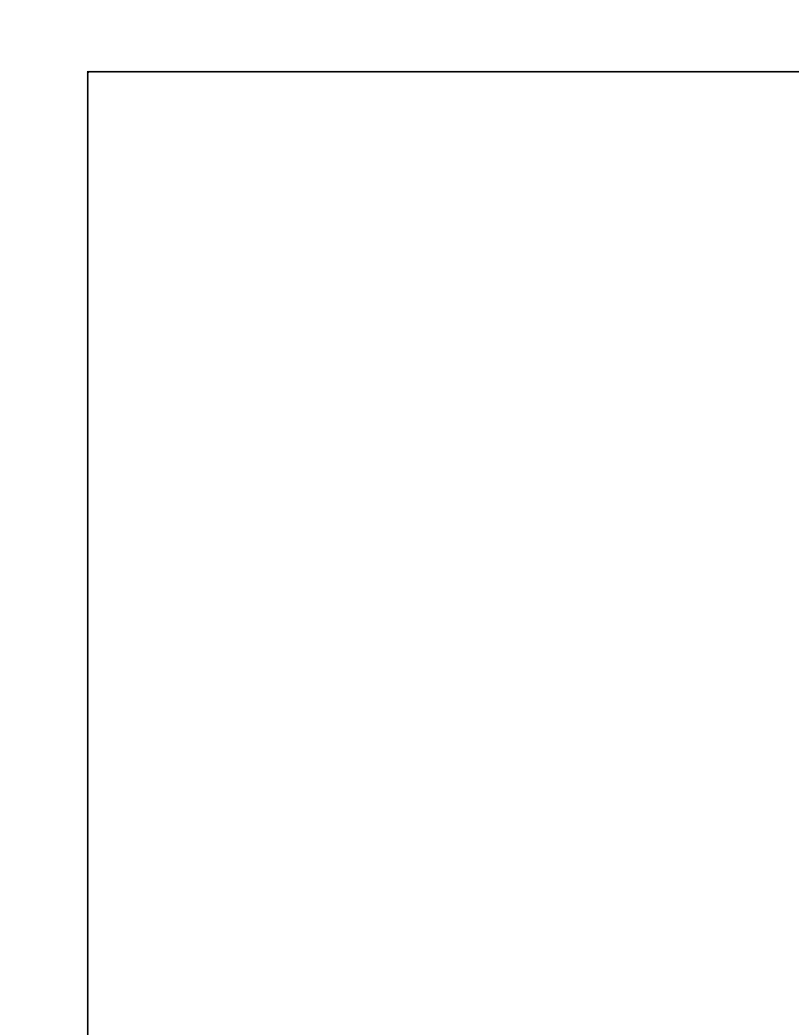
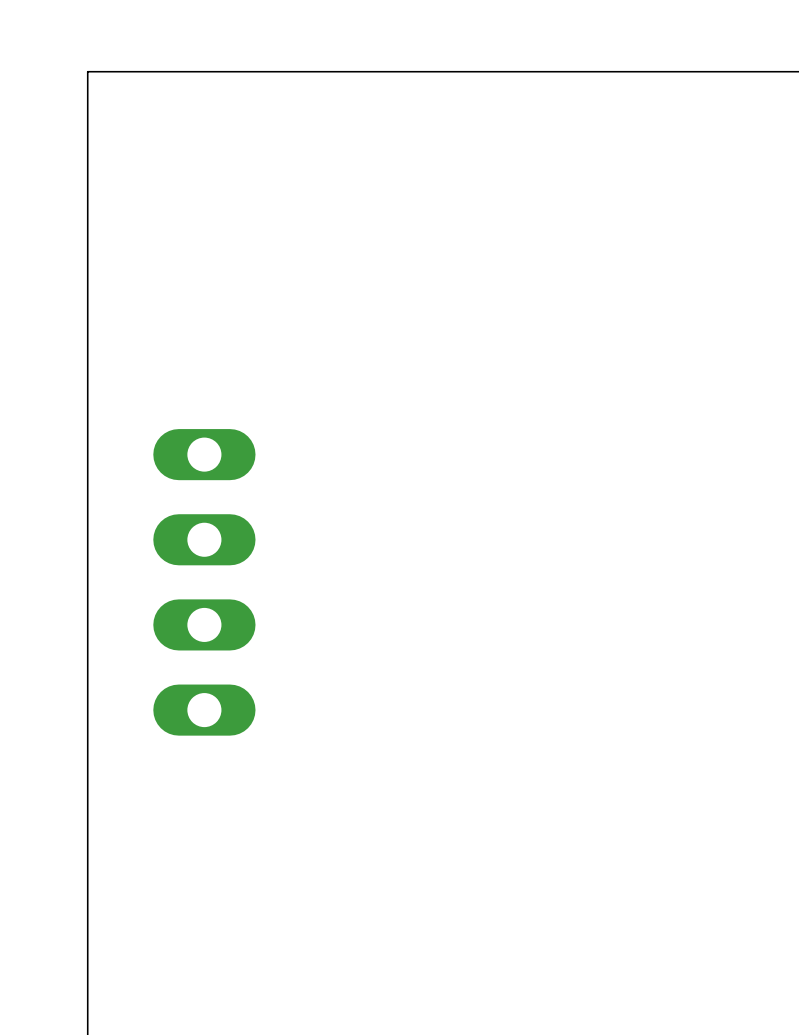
part: none -> (204, 582)

